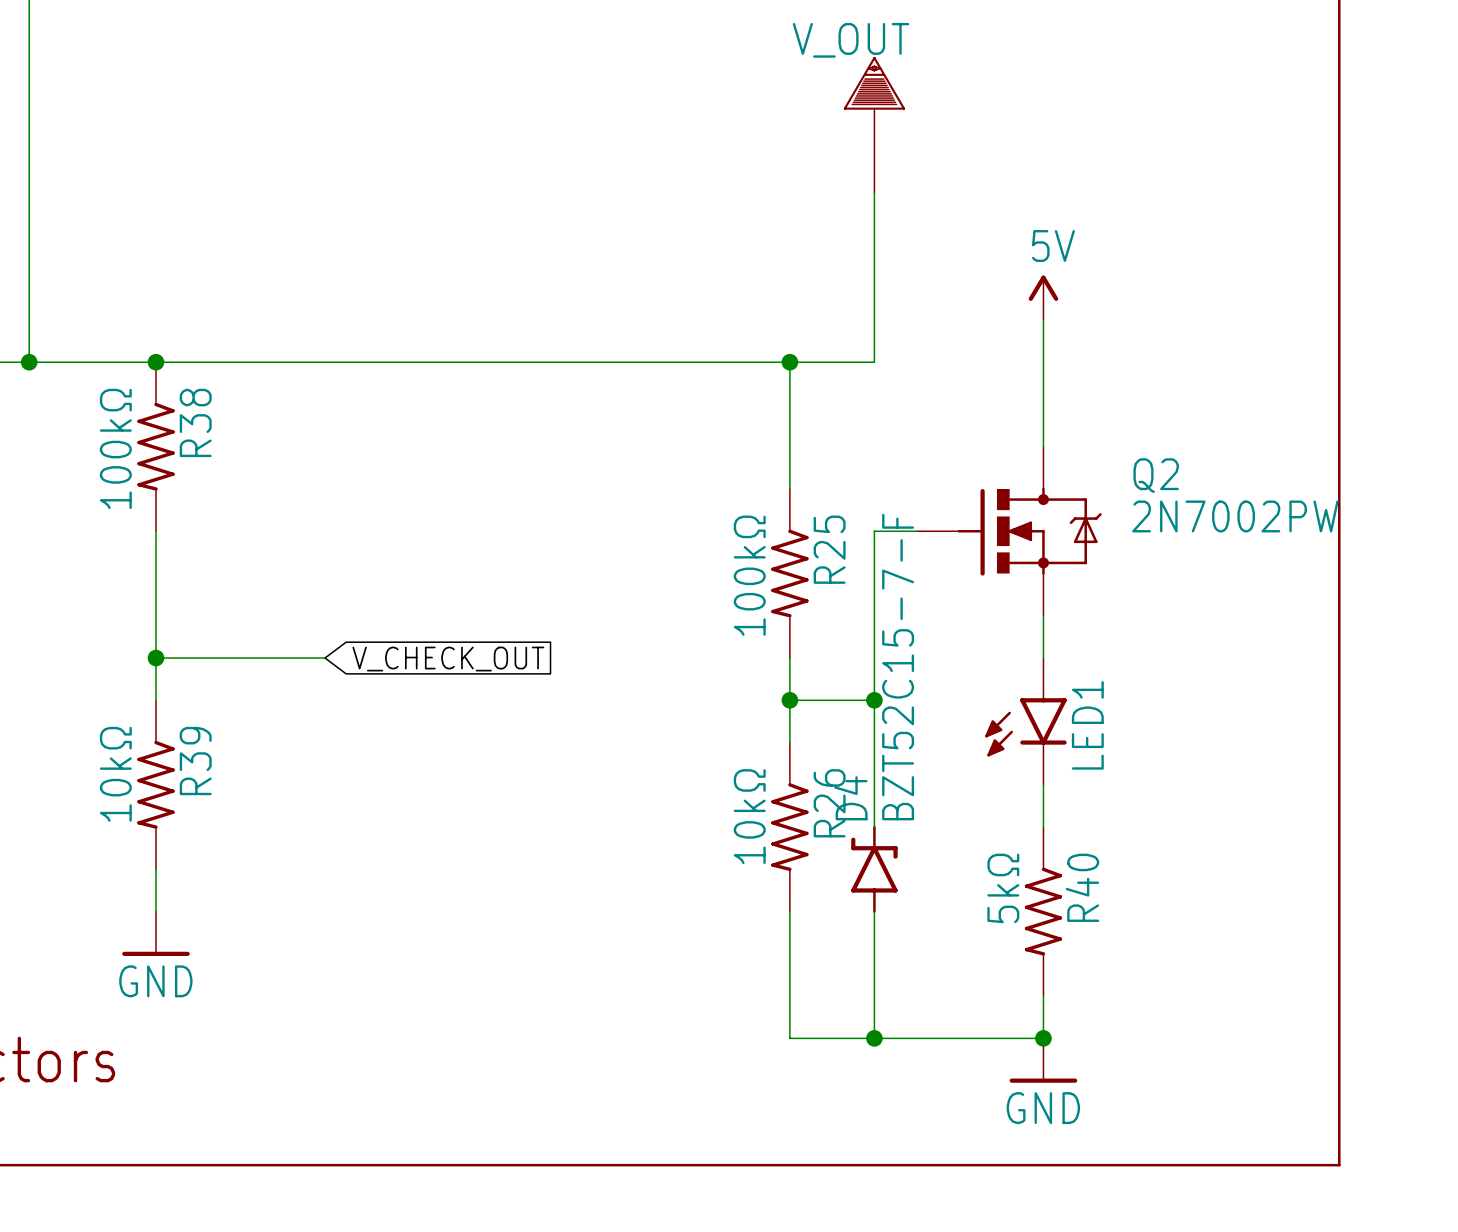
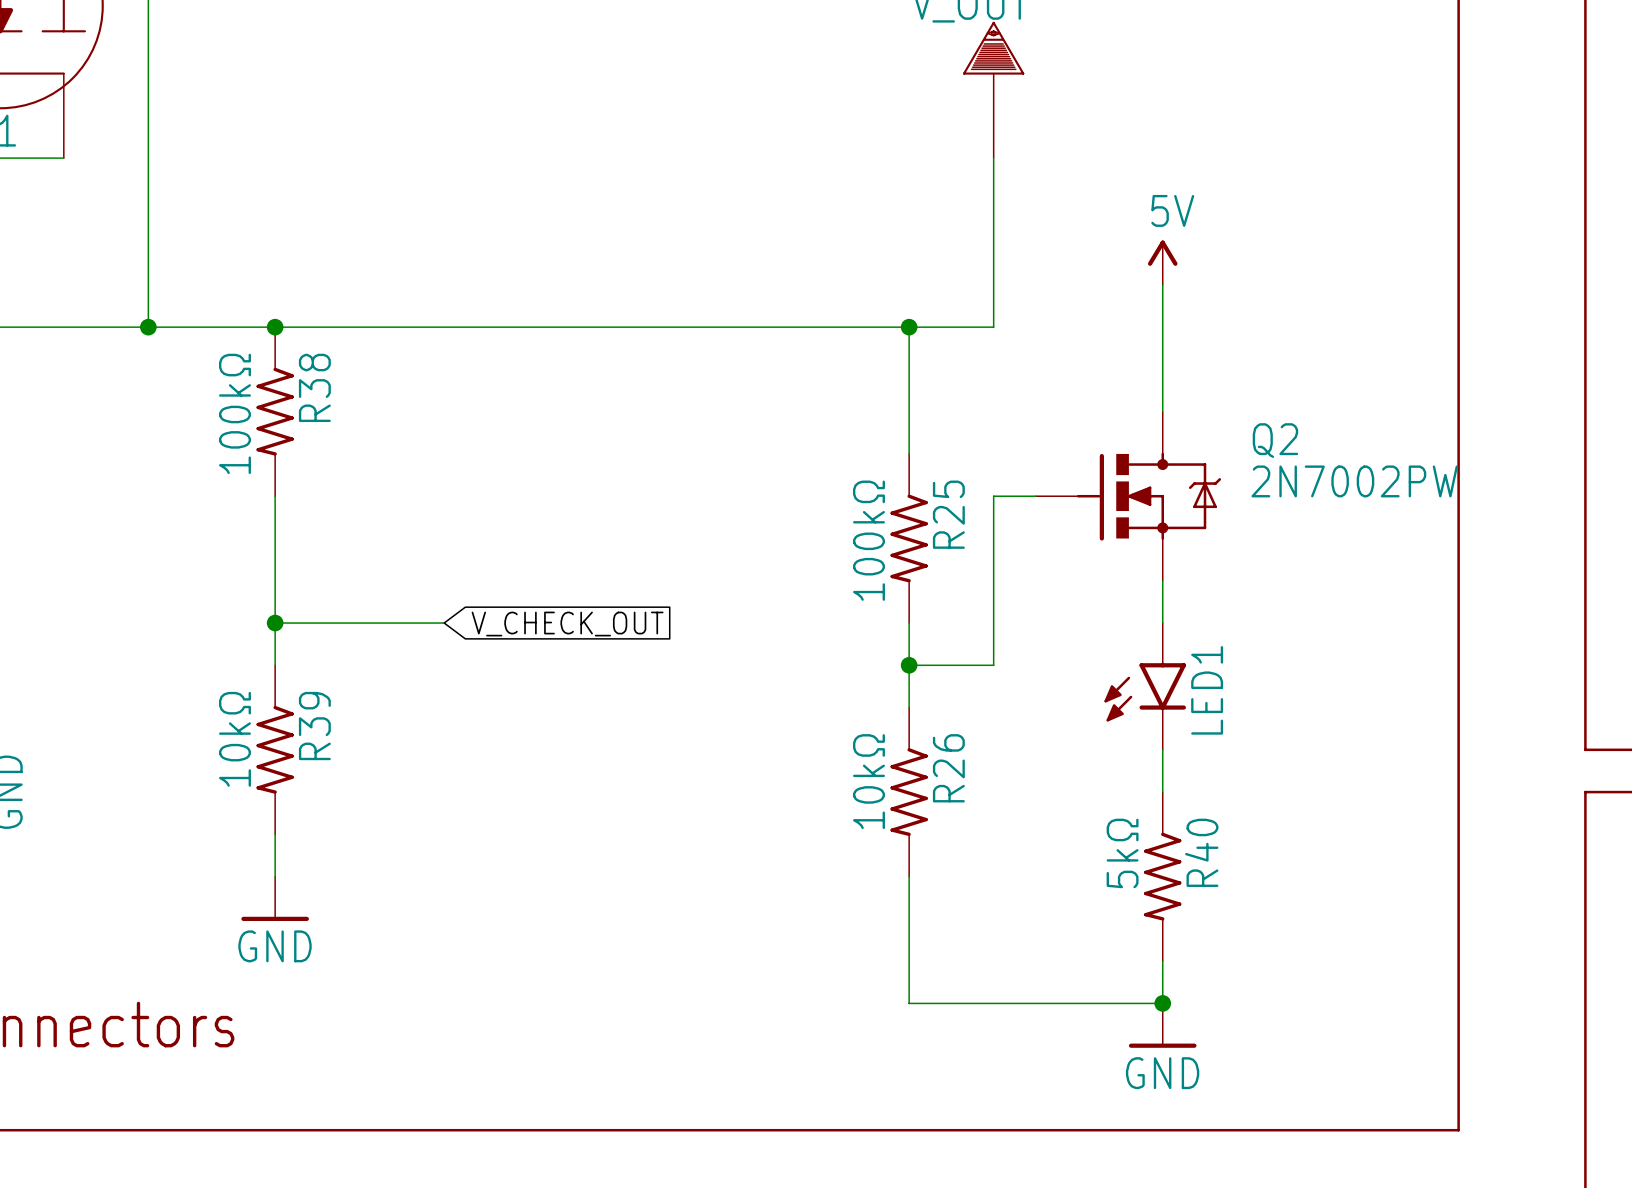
wire: (874, 700) (874, 827) -> none
junction: (874, 700) -> none
D4: BZT52C15-7-F (874, 869) -> none
wire: (874, 911) (874, 1038) -> none
junction: (874, 1038) -> none

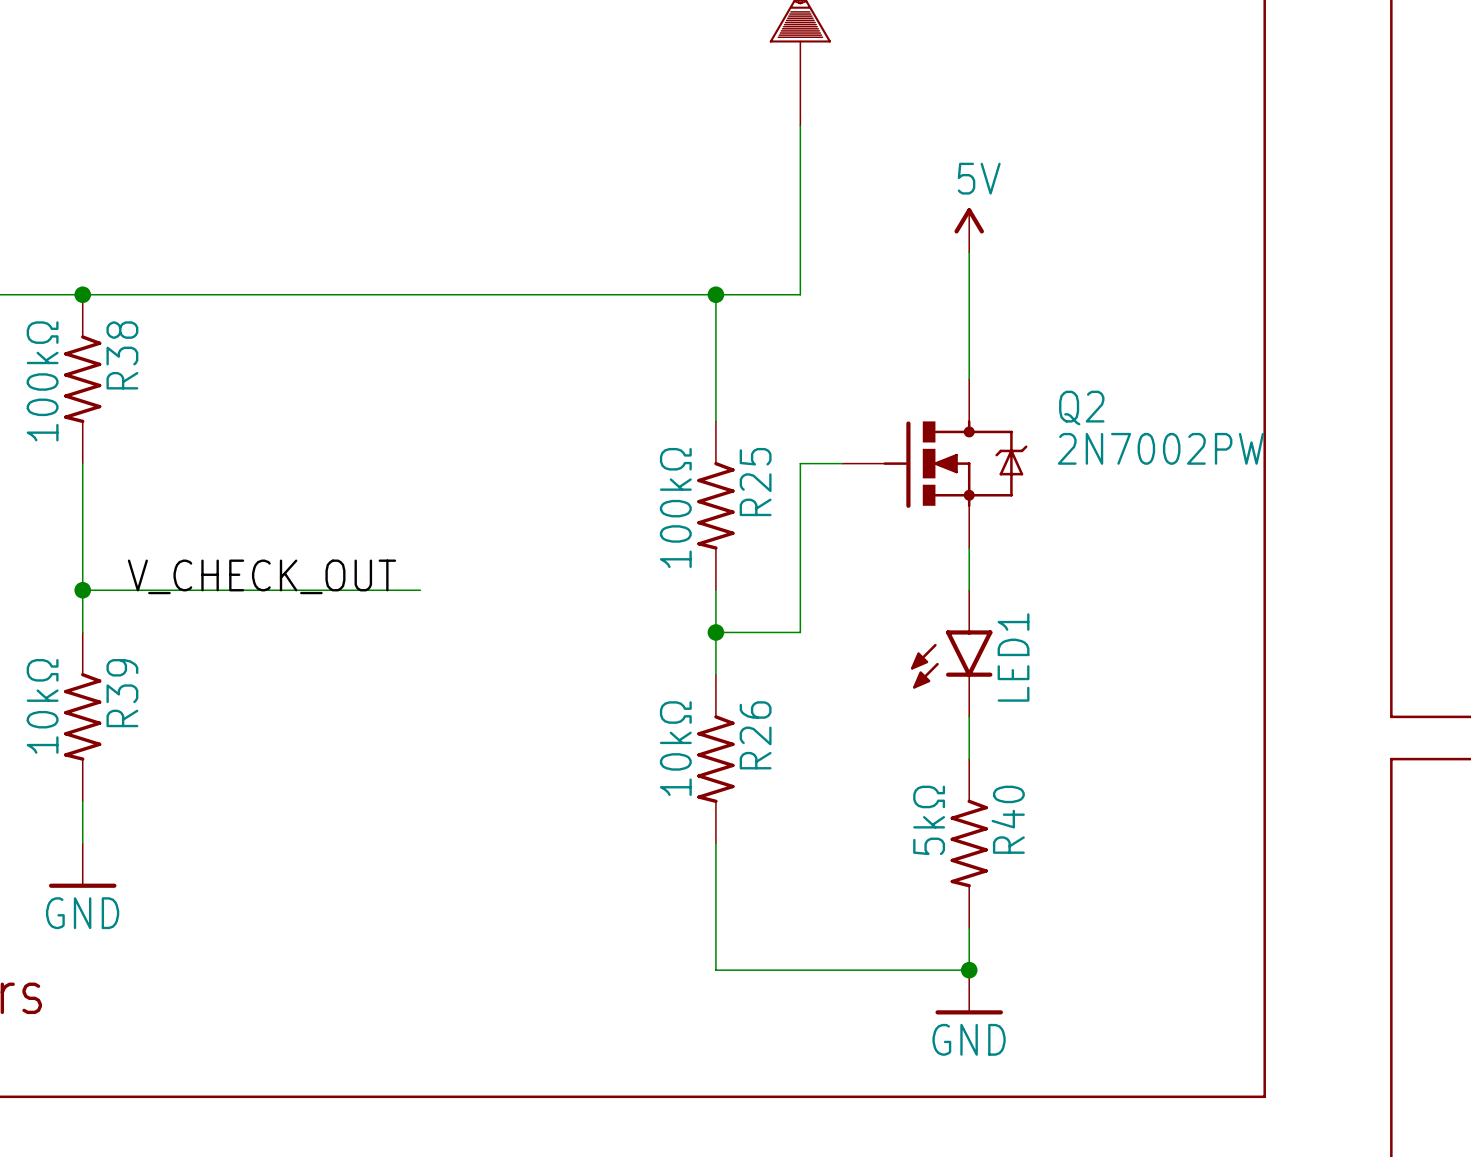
label: none -> V_CHECK_OUT (262, 576)
wire: none -> (251, 590) (420, 590)
global label: V_CHECK_OUT (567, 624) -> none

